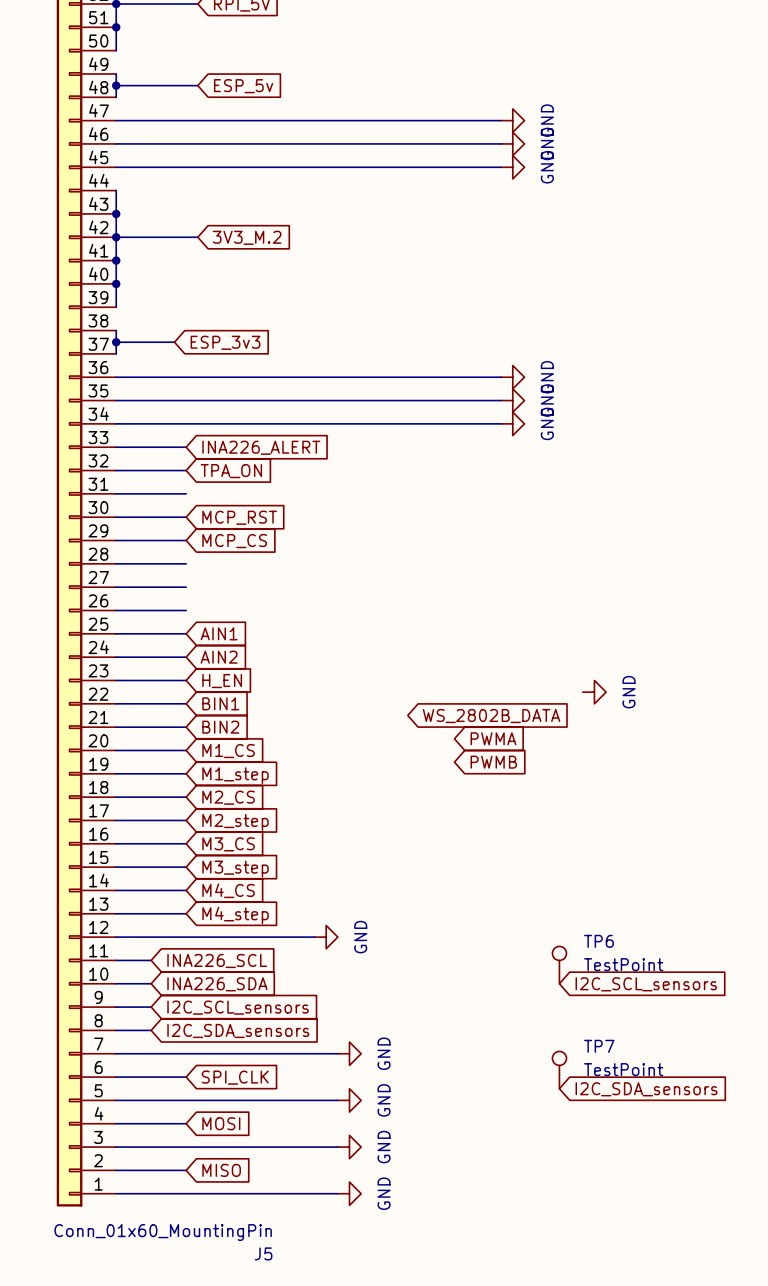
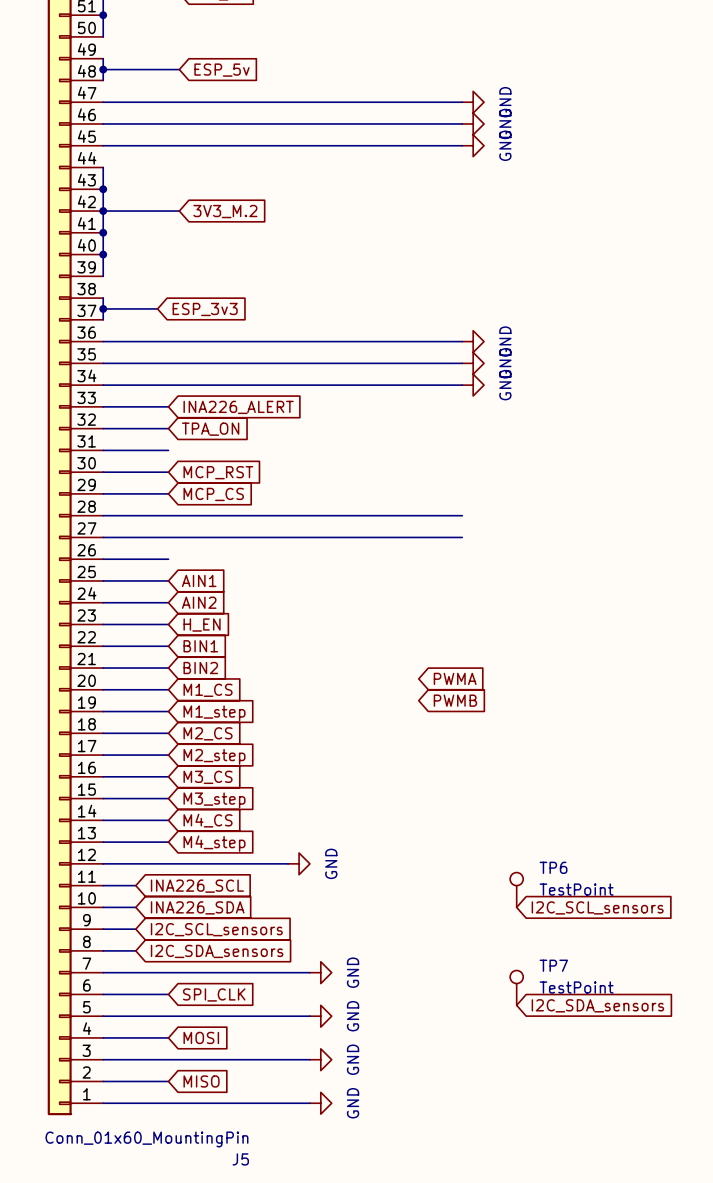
wire: none -> (168, 515) (462, 515)
wire: none -> (168, 537) (462, 537)
power symbol: GND (594, 692) -> none
global label: WS_2802B_DATA (491, 716) -> none

